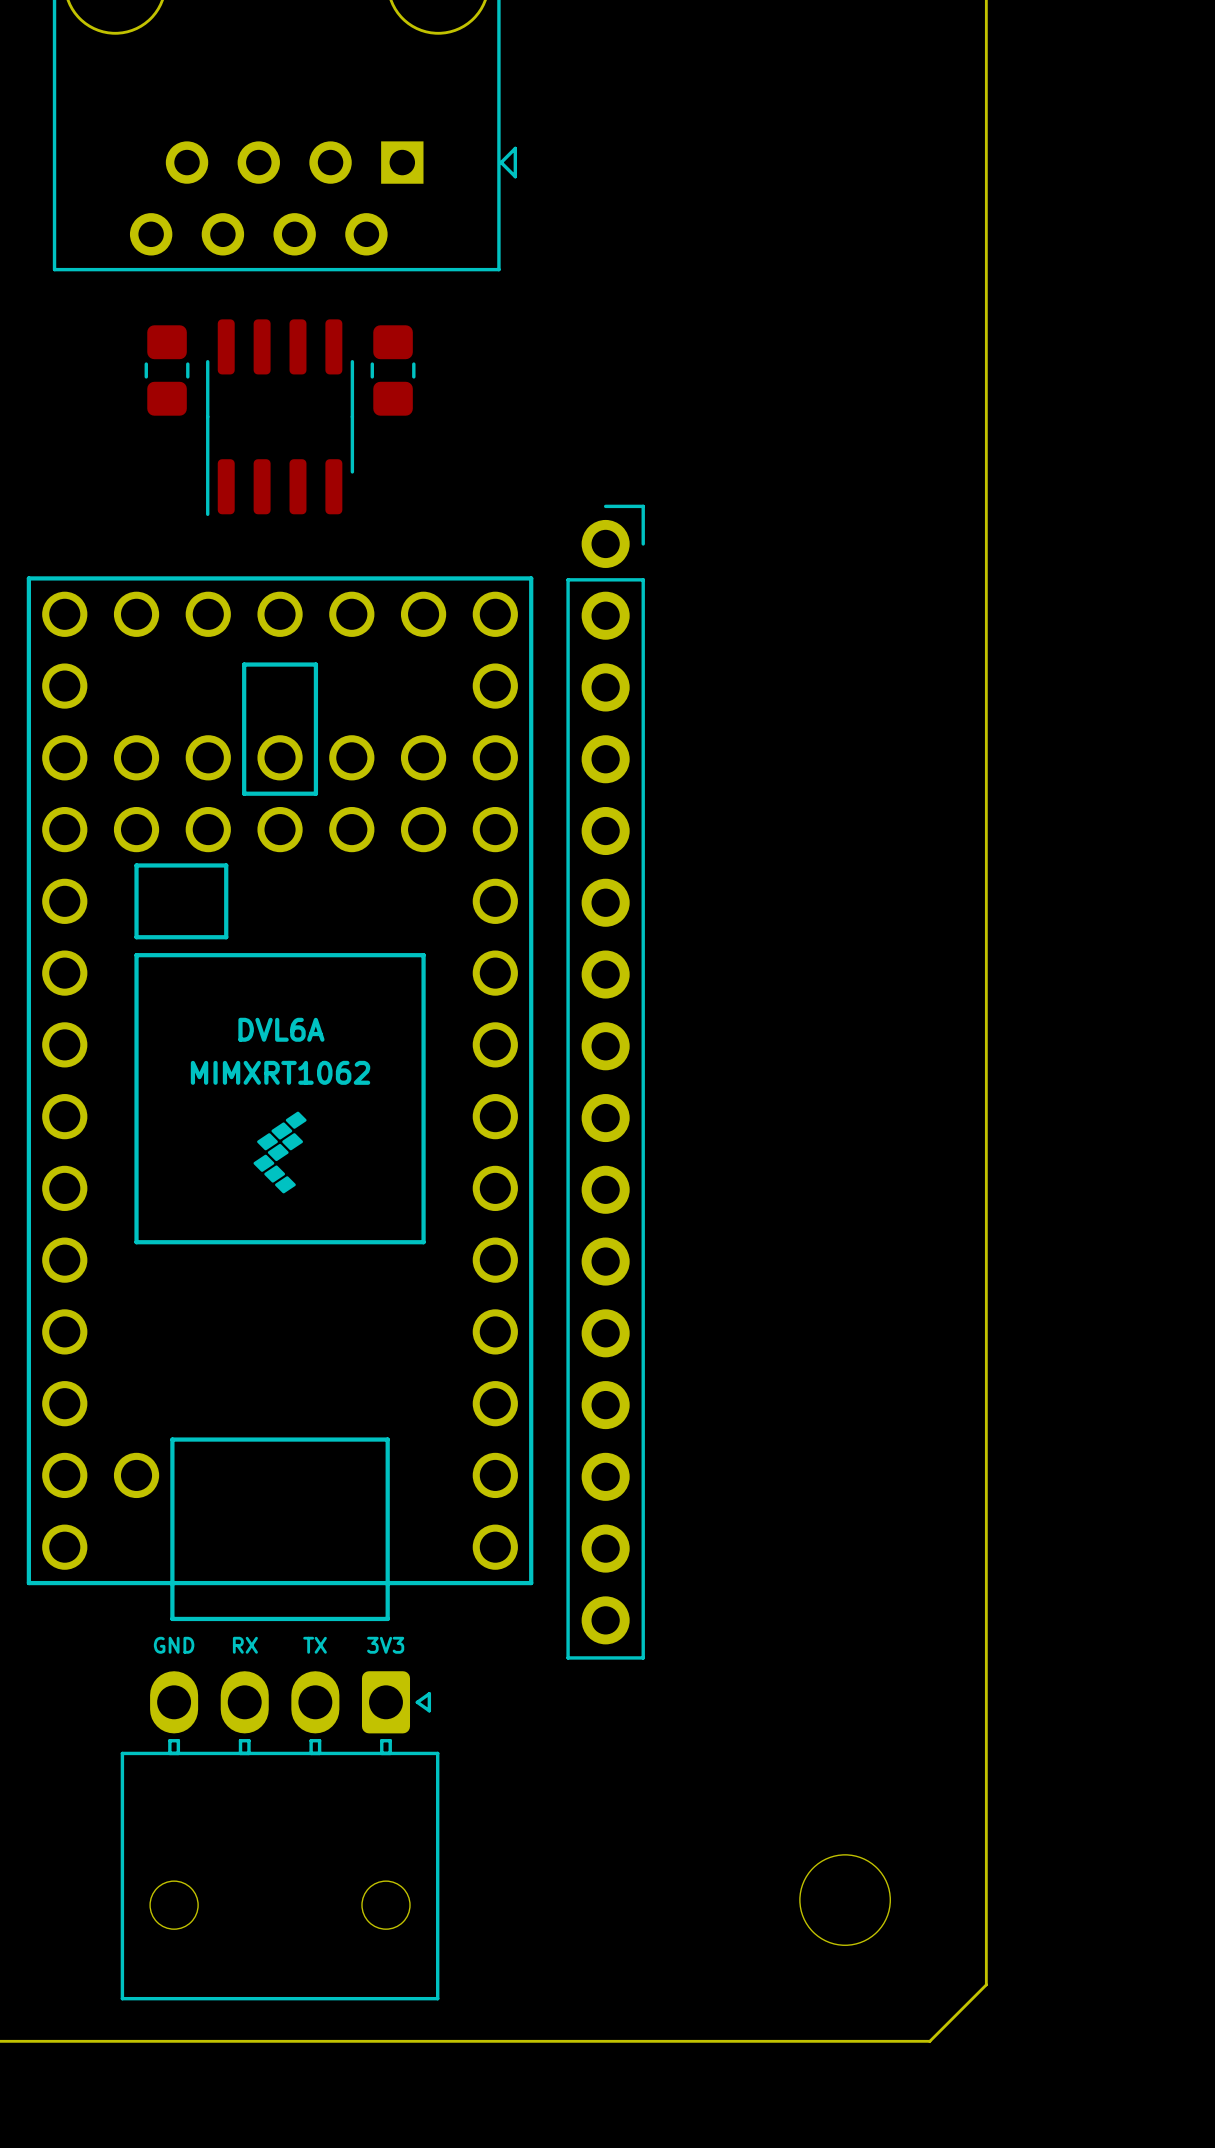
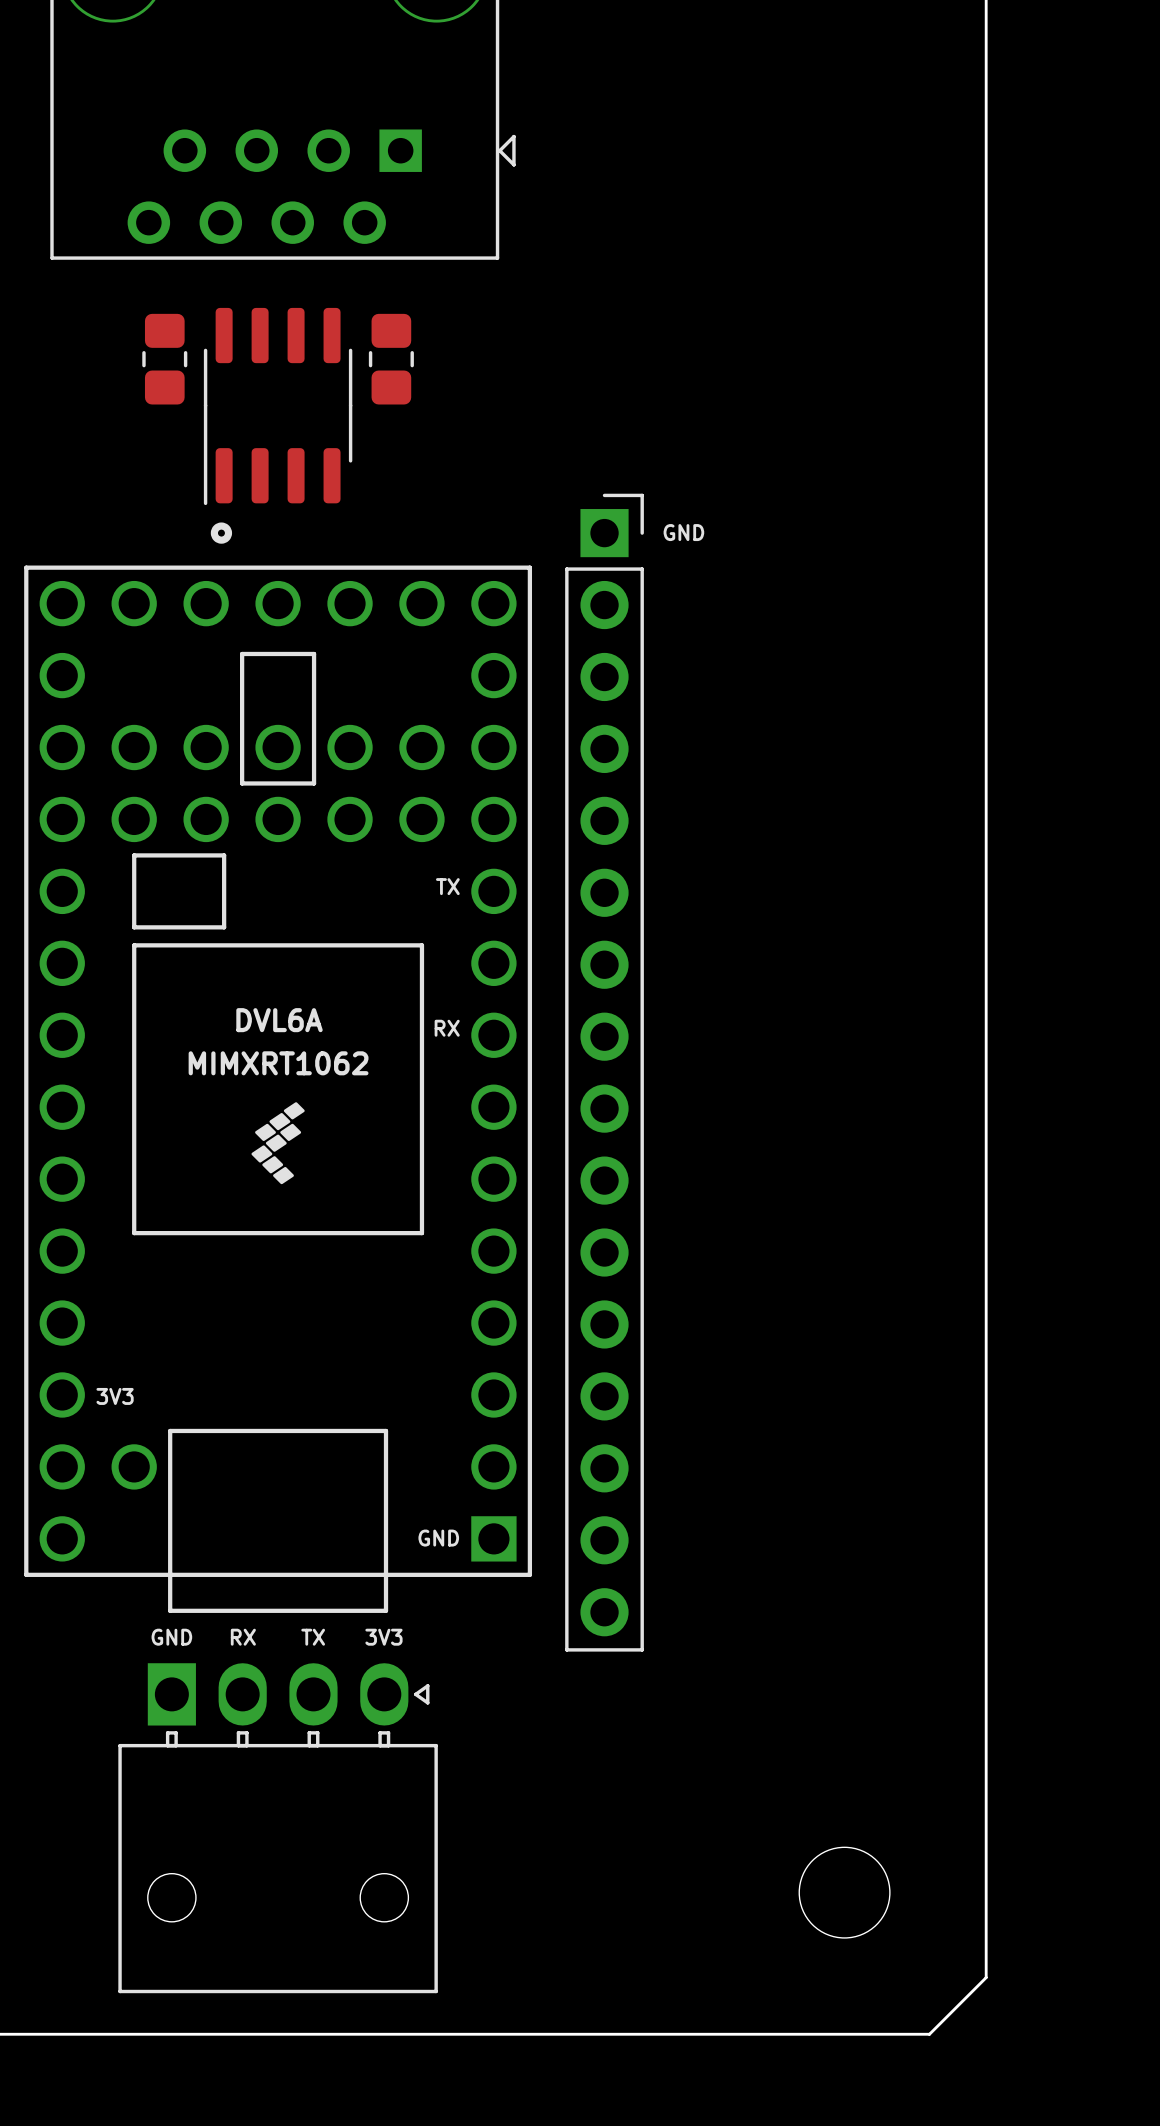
part footprint: [566, 504, 645, 1660] -> [565, 493, 644, 1652]
drawing: none -> [210, 522, 233, 544]
text: none -> GND (683, 532)
part footprint: [26, 576, 534, 1622] -> [24, 565, 533, 1613]
text: none -> TX (447, 886)
text: none -> RX (447, 1028)
text: none -> 3V3 (115, 1396)
text: none -> GND (438, 1538)
part footprint: [120, 1671, 440, 2001] -> [118, 1663, 438, 1994]

